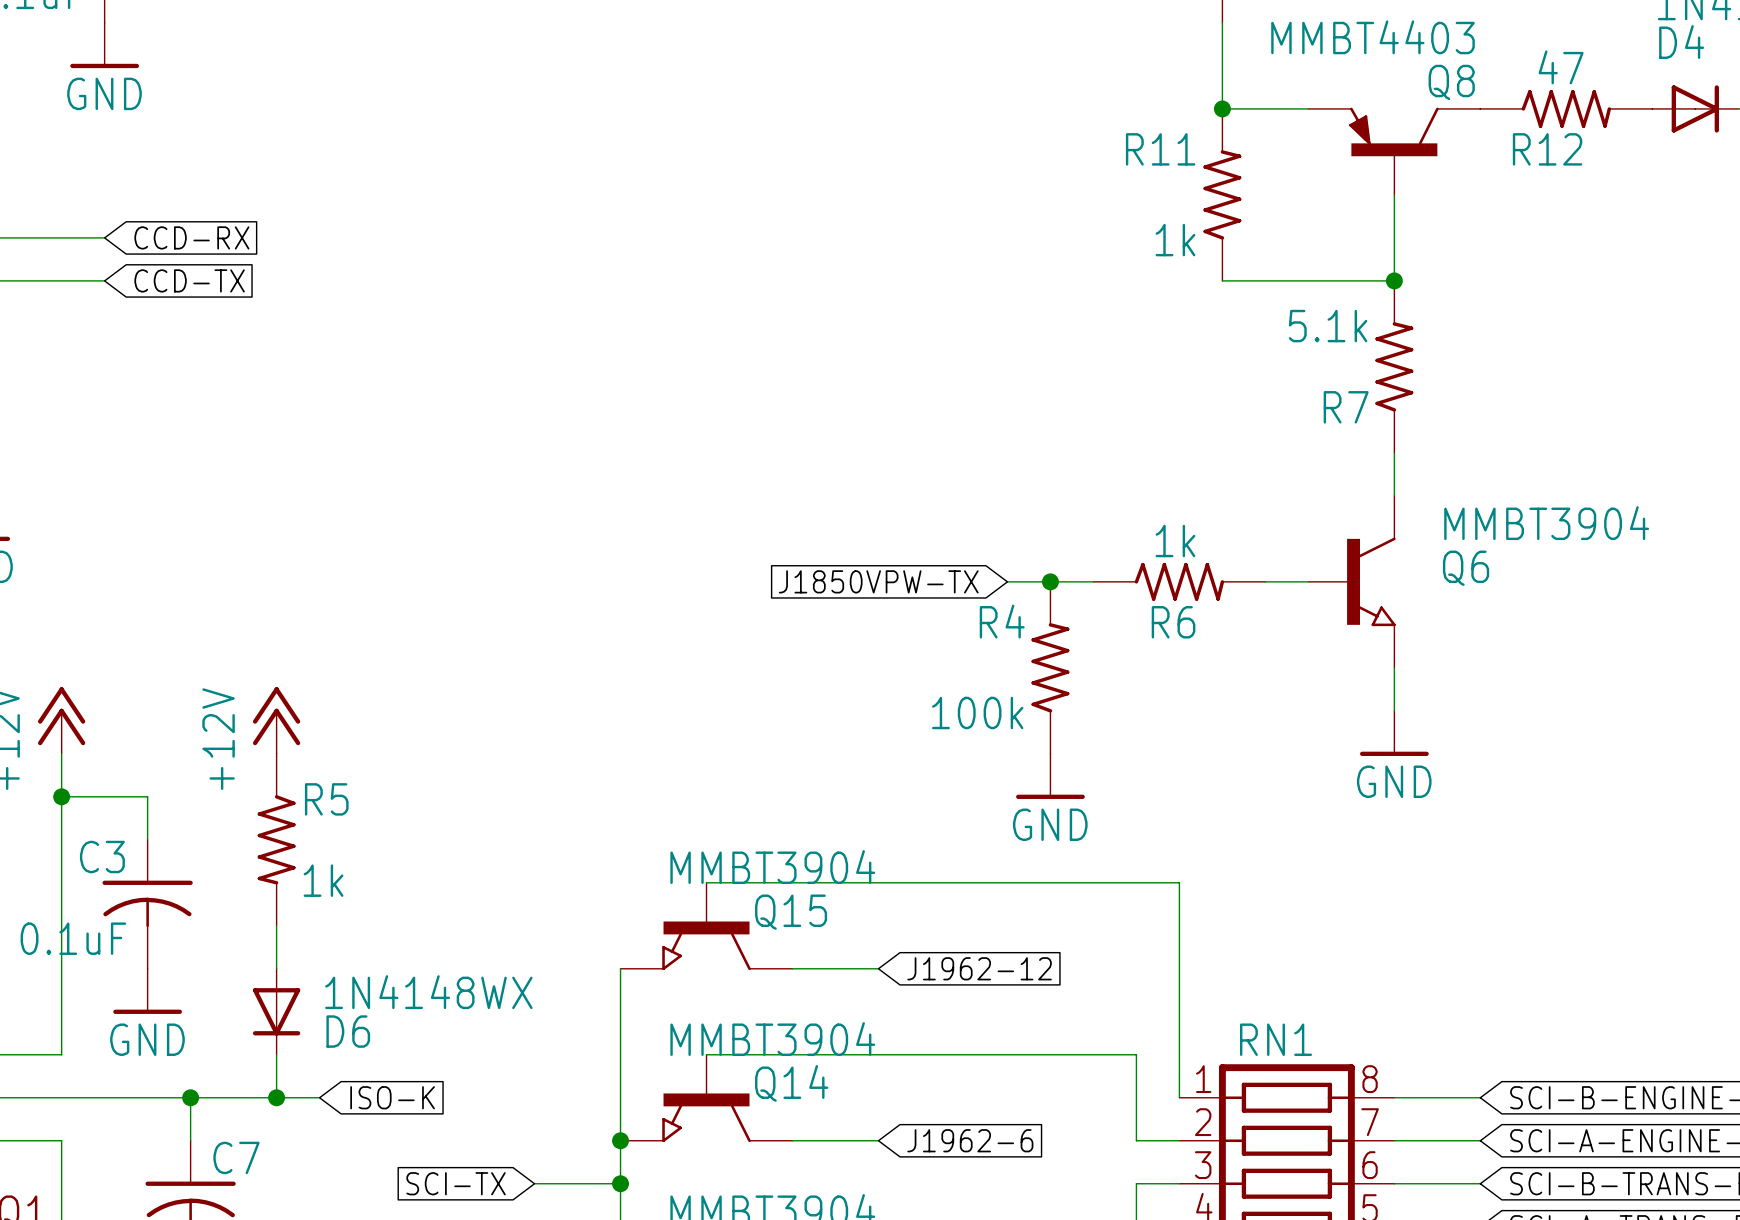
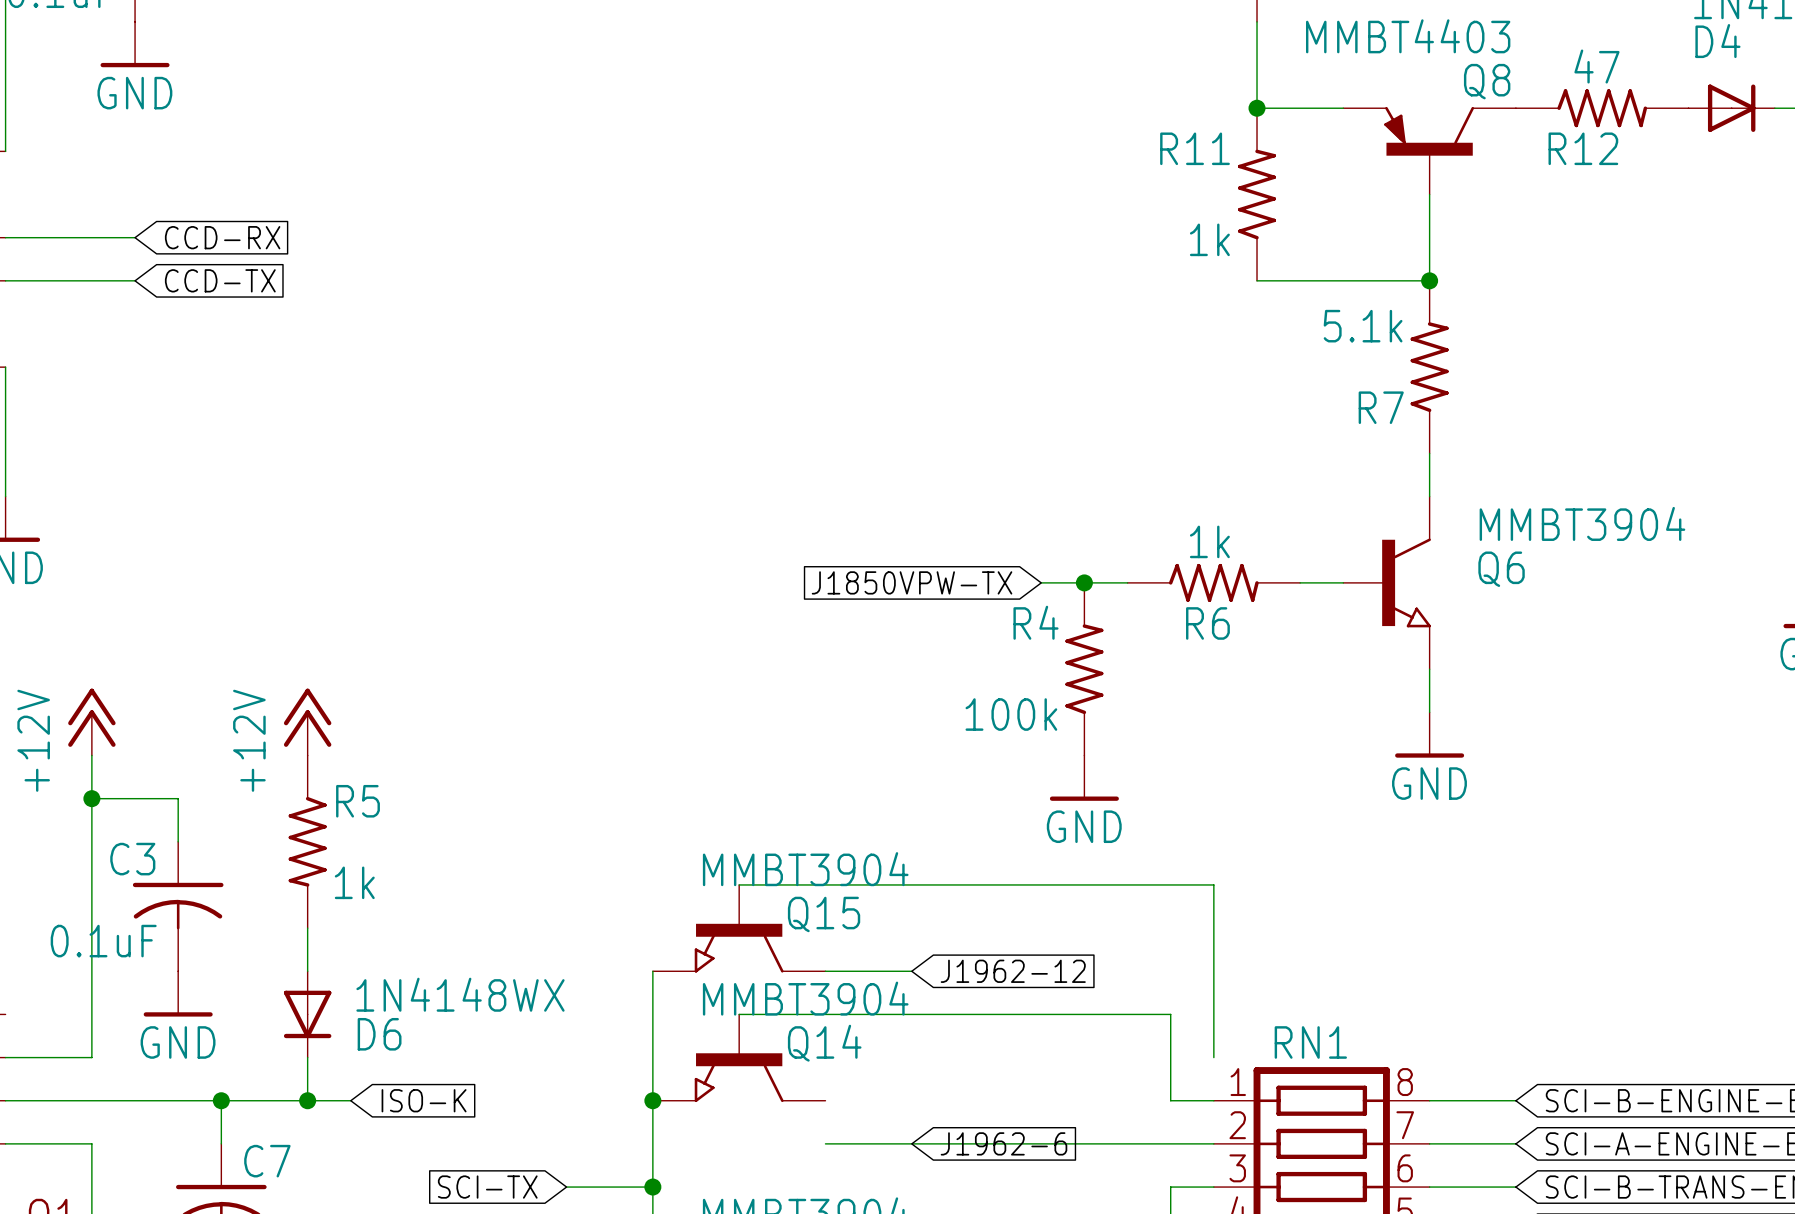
wire: (706, 1054) (1136, 1054) -> (739, 1014) (1170, 1014) (1170, 1057)
wire: (1179, 1054) (1179, 1097) -> none
wire: (1136, 1097) (1136, 1140) -> (1170, 1100) (1213, 1100)
Q14 position: (706, 1098) -> (739, 1058)
junction position: (620, 1140) -> (652, 1100)
wire: none -> (911, 1143) (1170, 1143)

